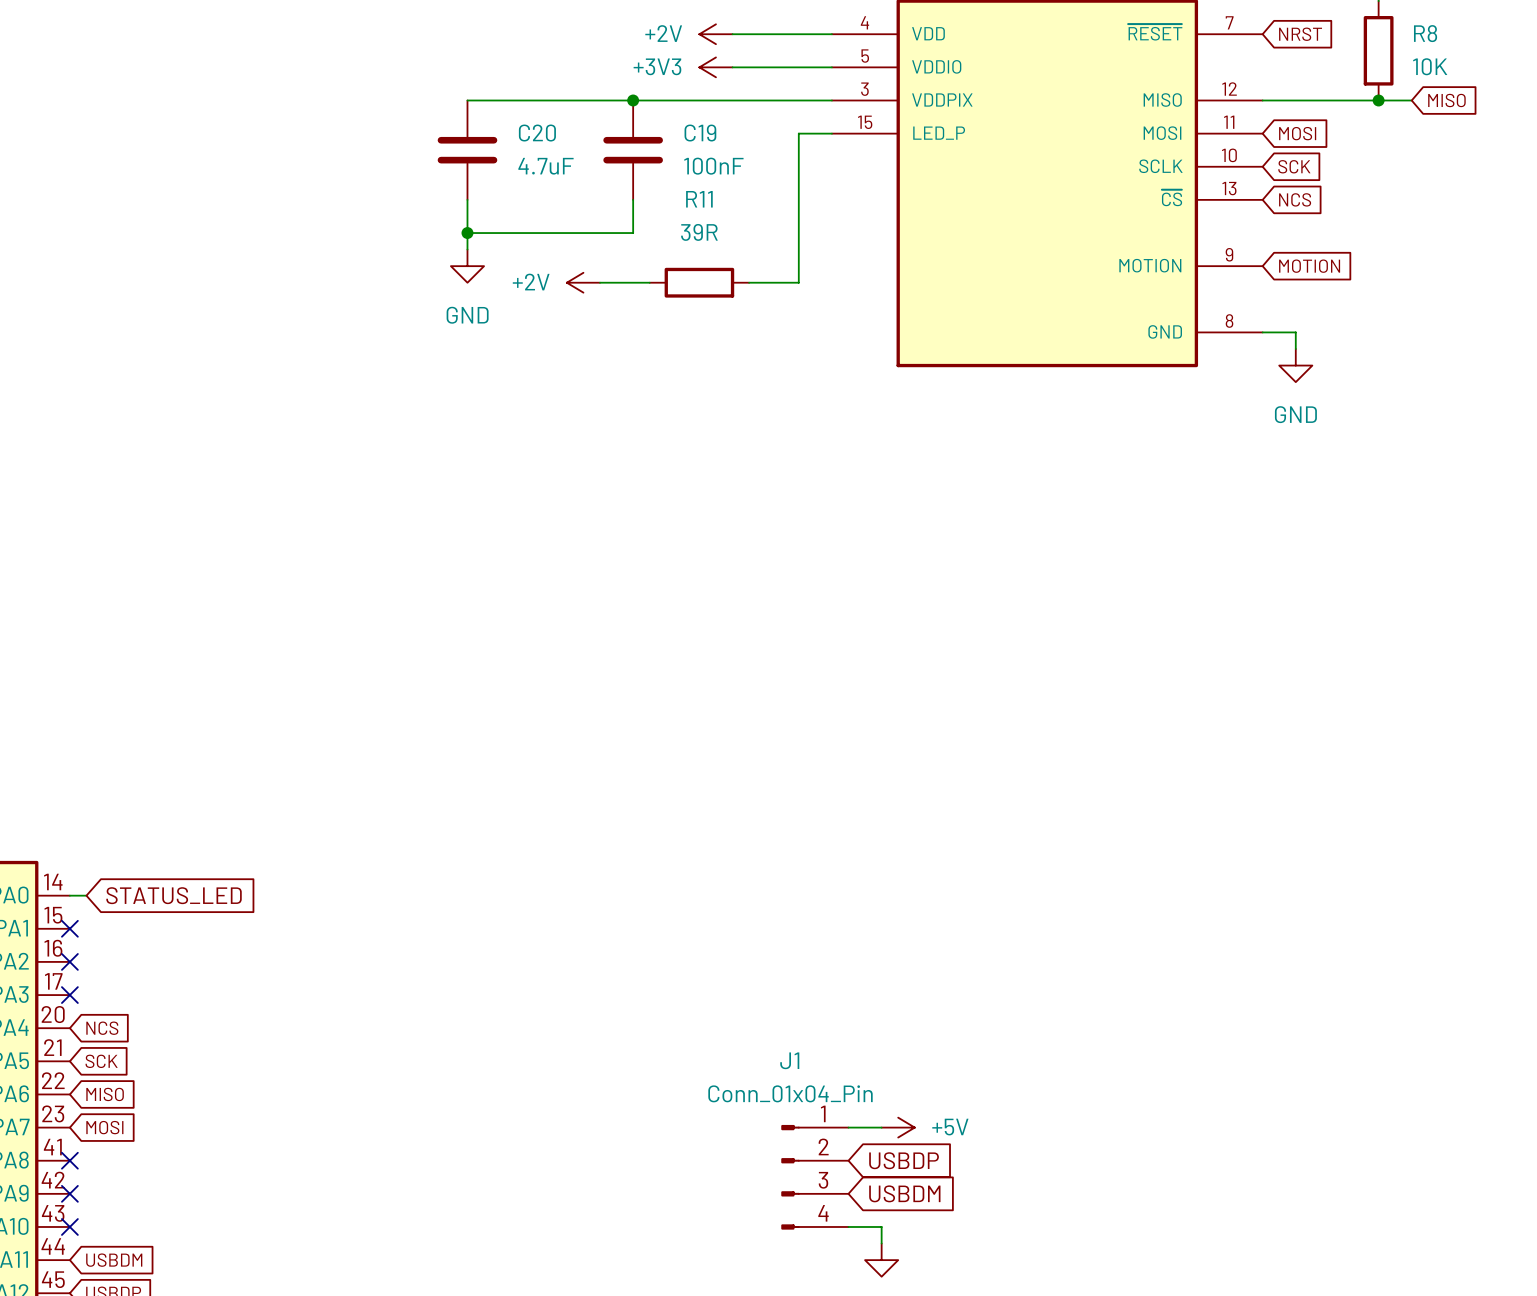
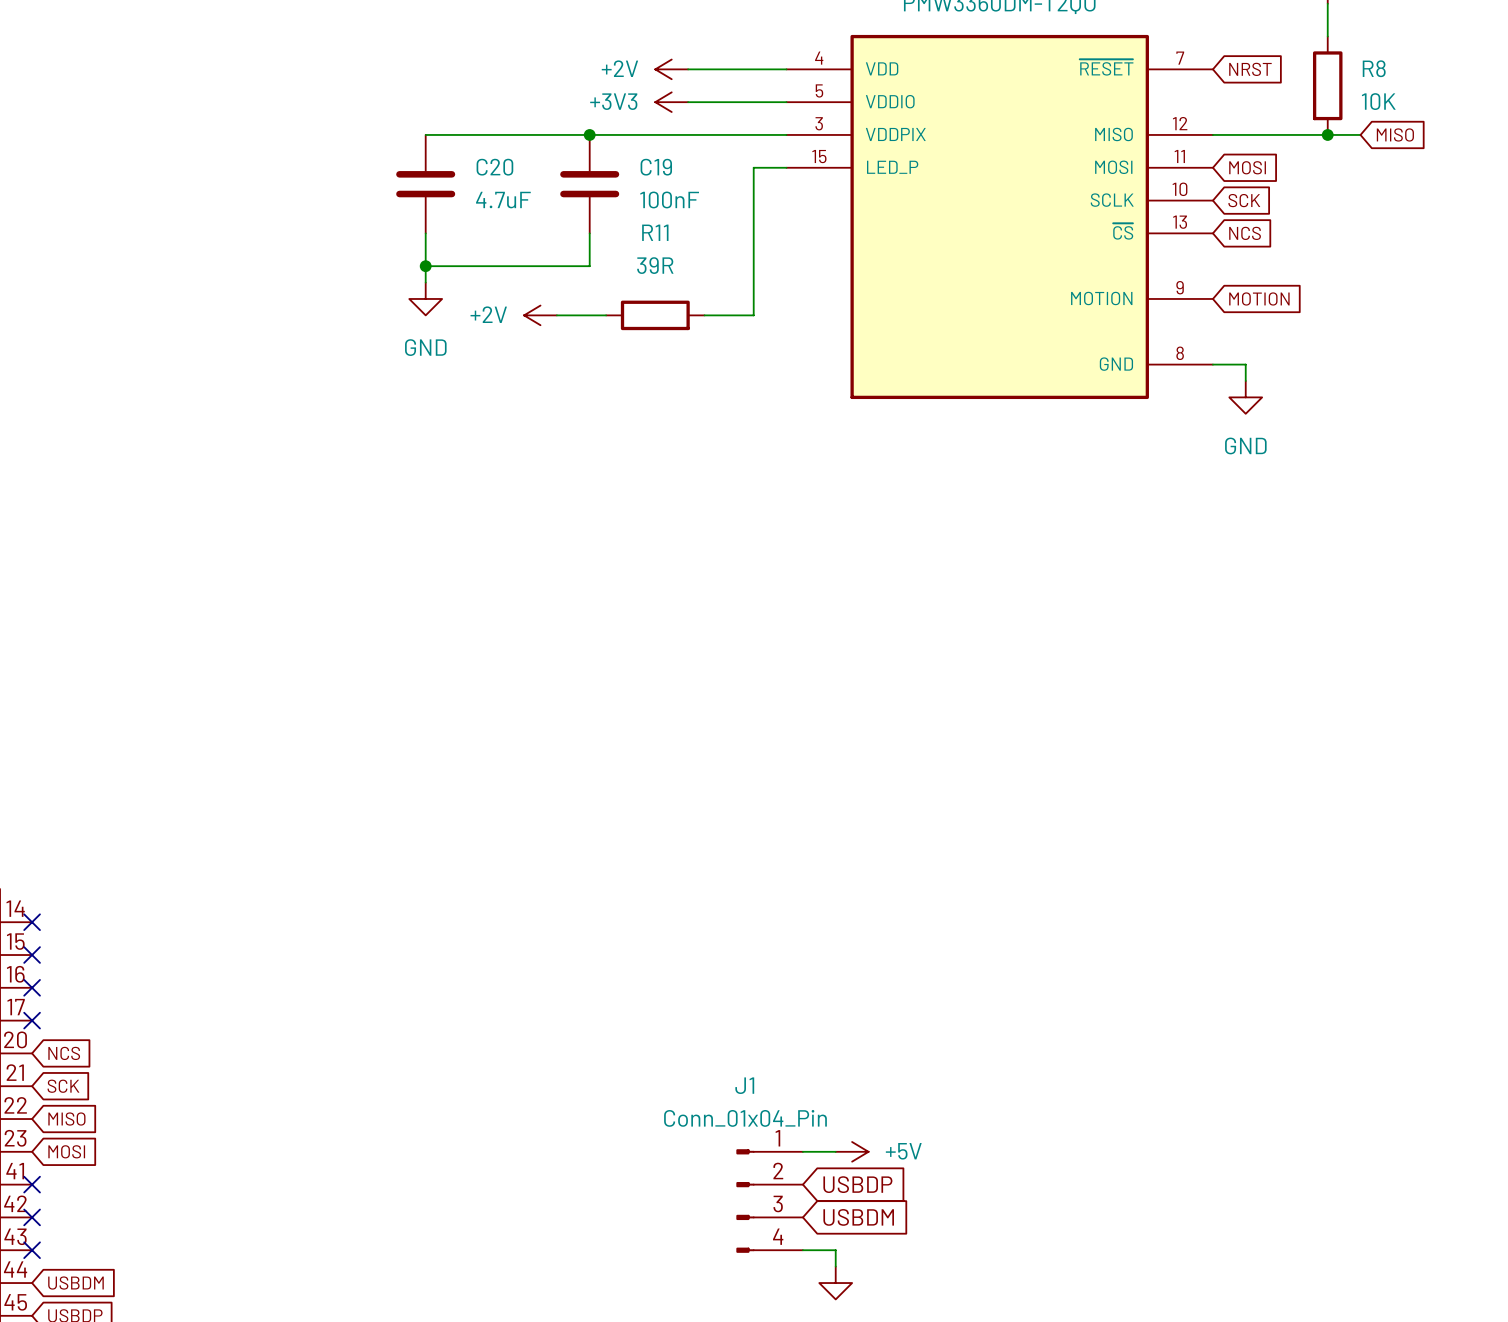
wire: (69, 895) (86, 895) -> none
no-connect mark: none -> (32, 922)
global label: STATUS_LED (174, 895) -> none

